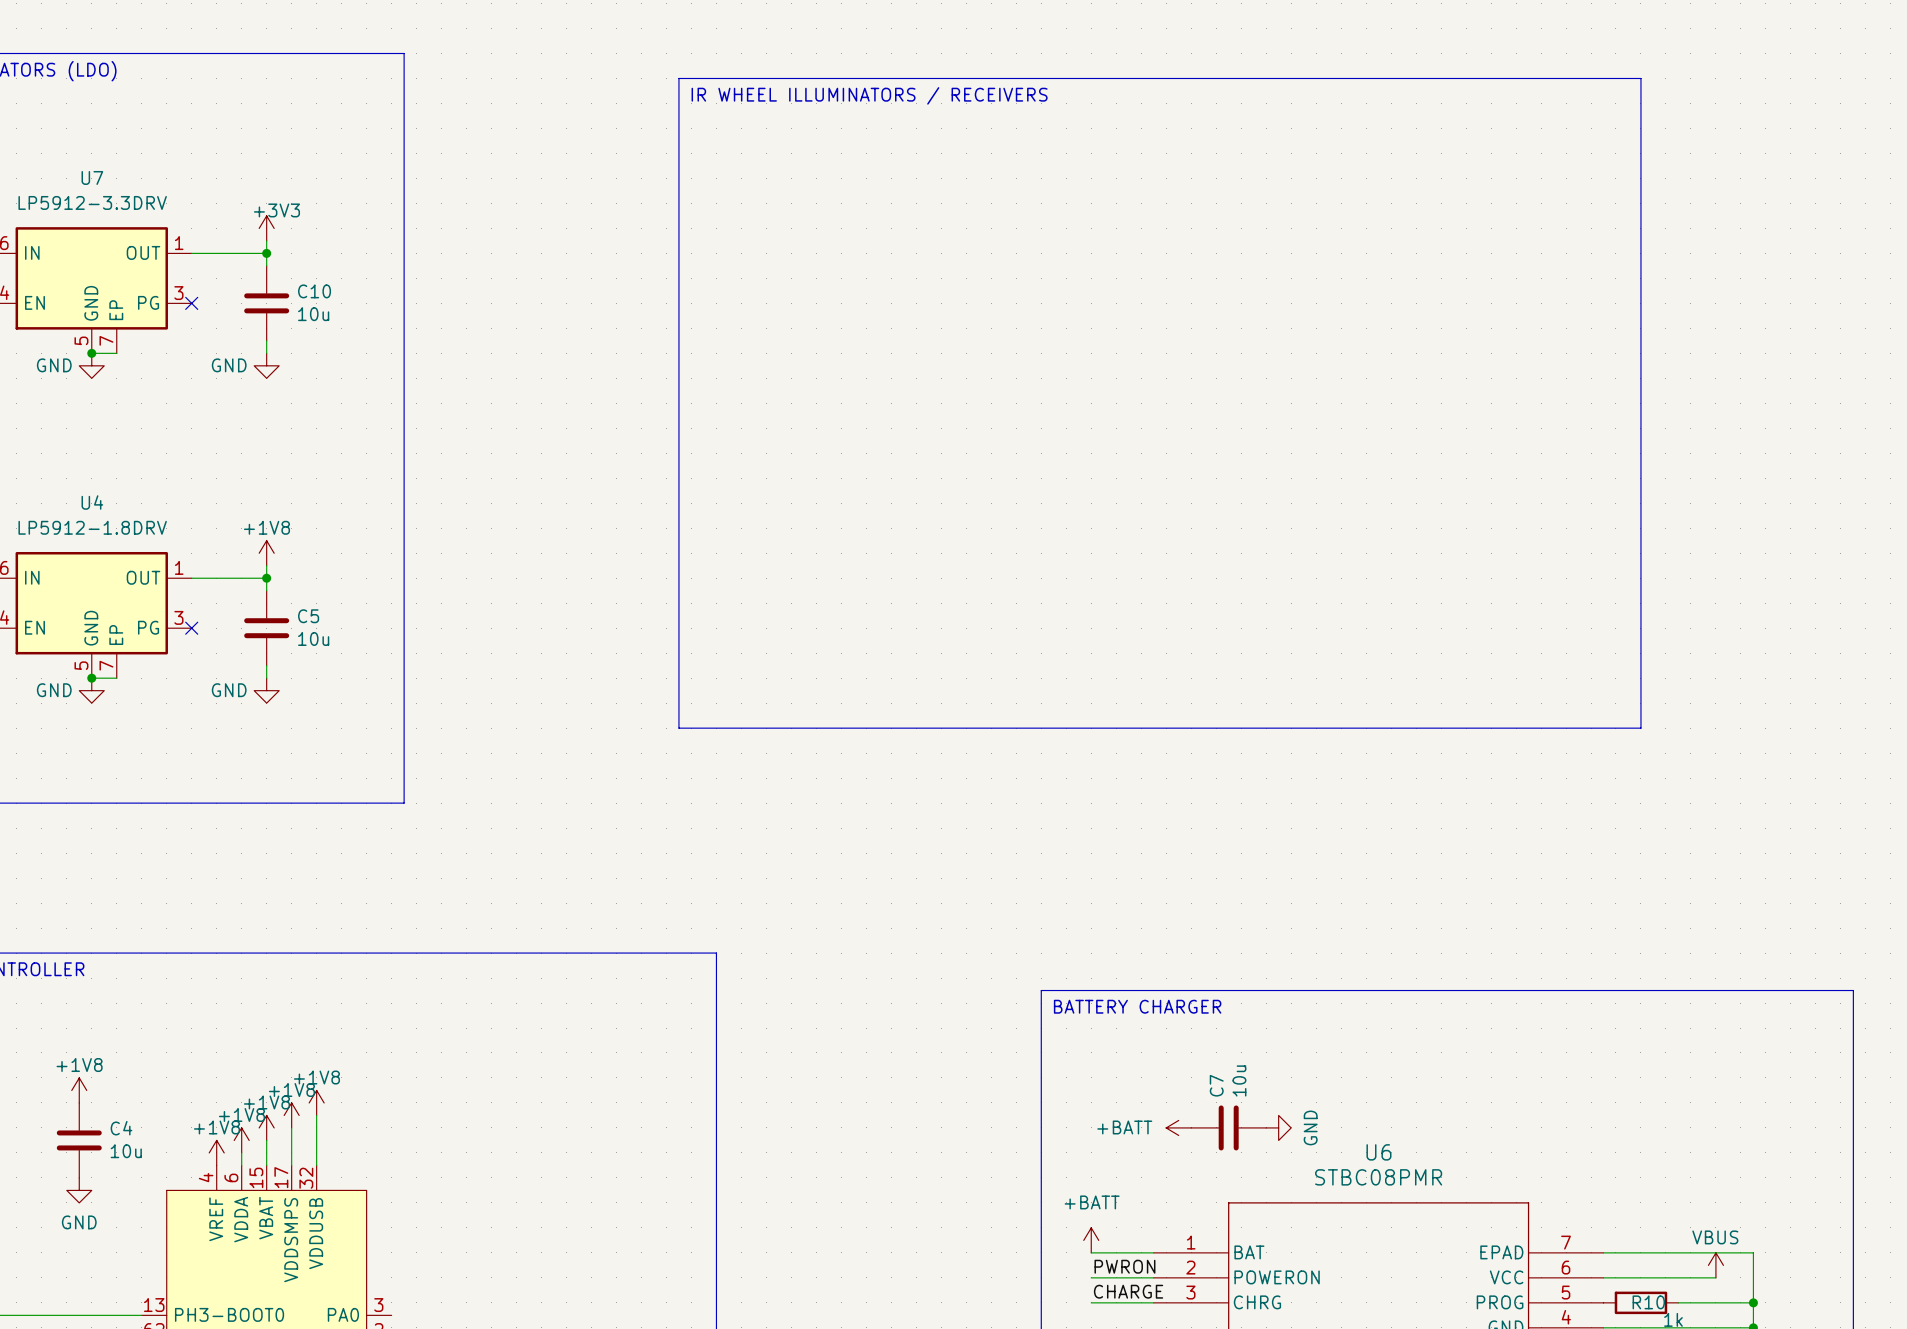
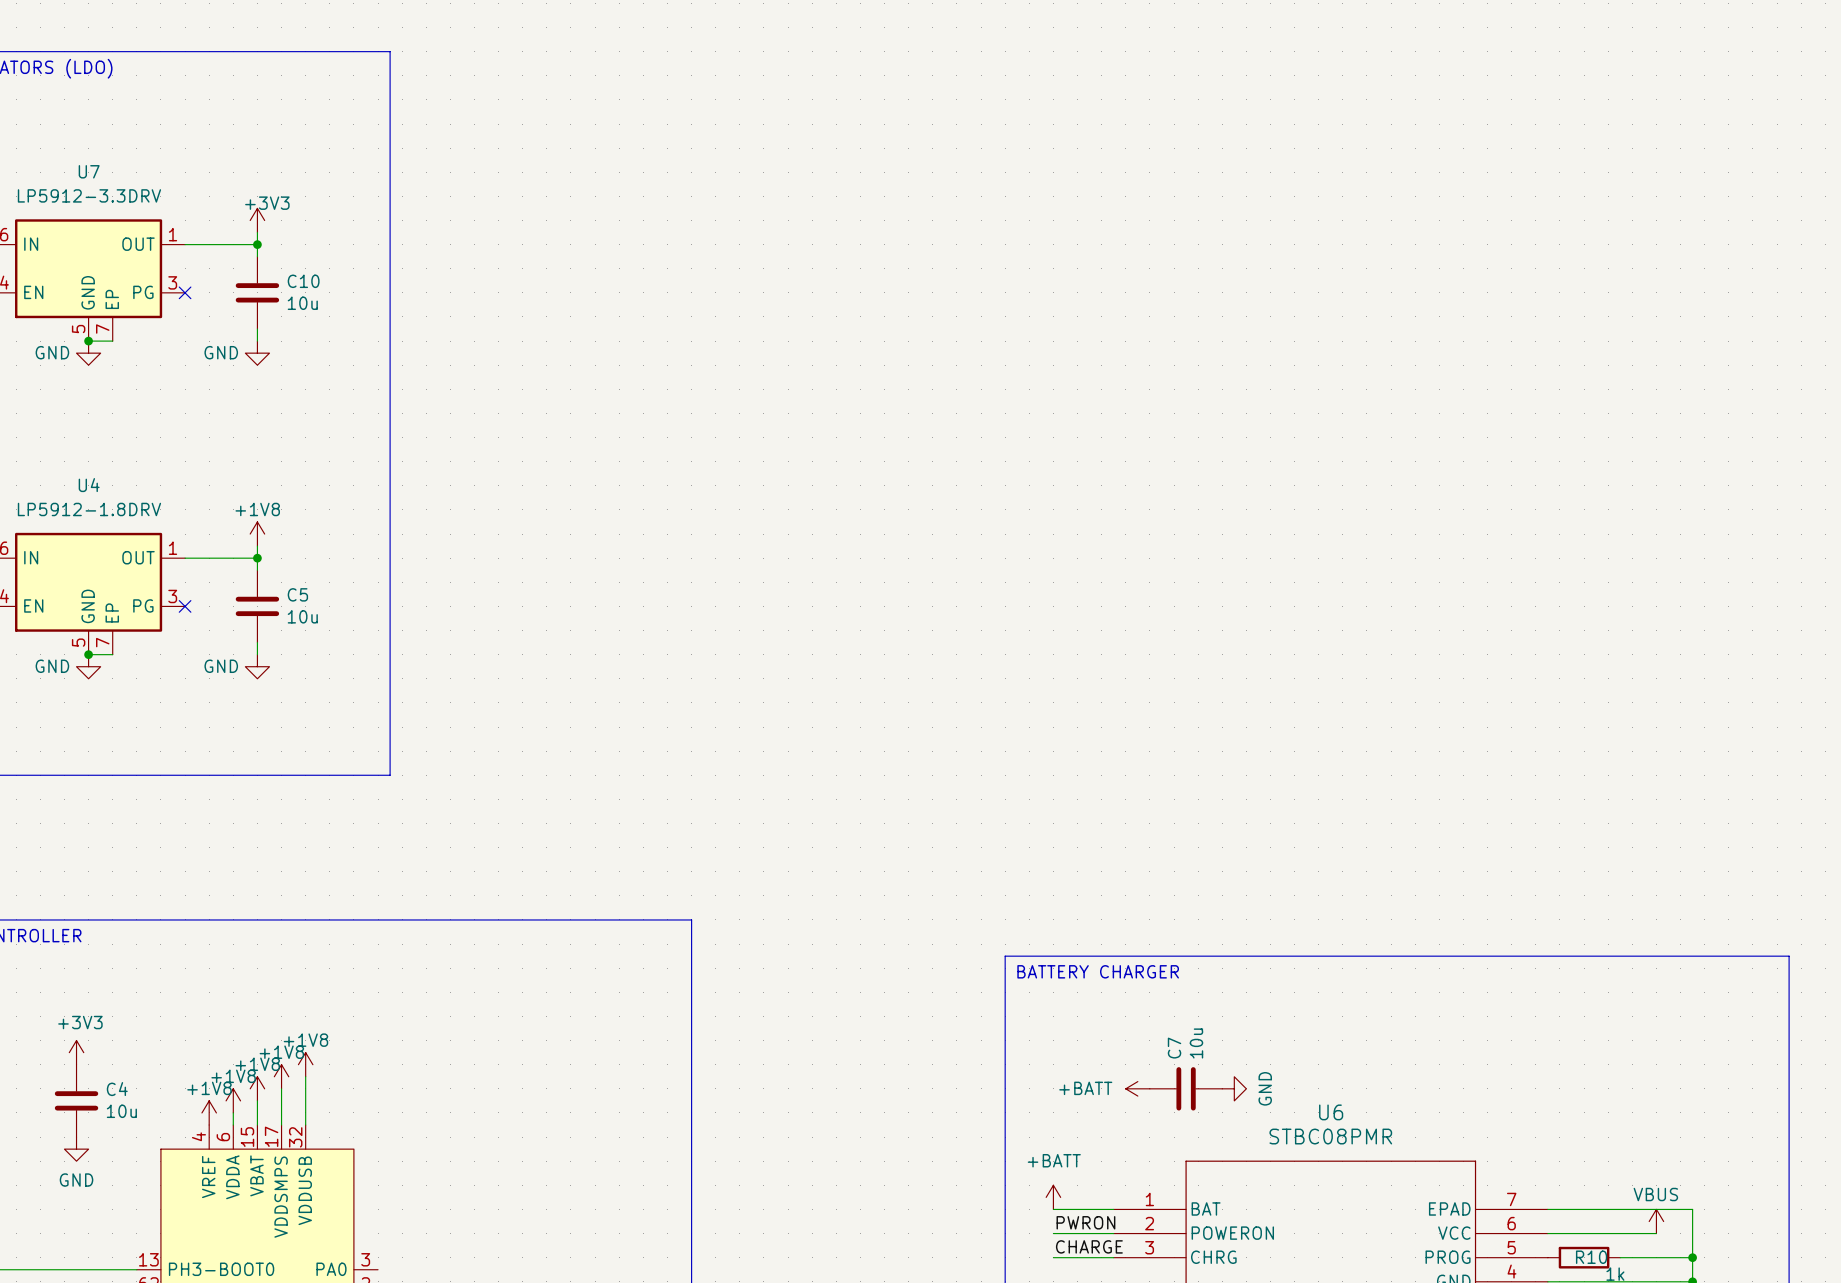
line: (678, 78) (1640, 78) (1640, 728) (678, 728) (678, 78) -> none
text: IR WHEEL ILLUMINATORS / RECEIVERS (869, 95) -> none
power symbol: +1V8 (79, 1090) -> +3V3 (76, 1052)

